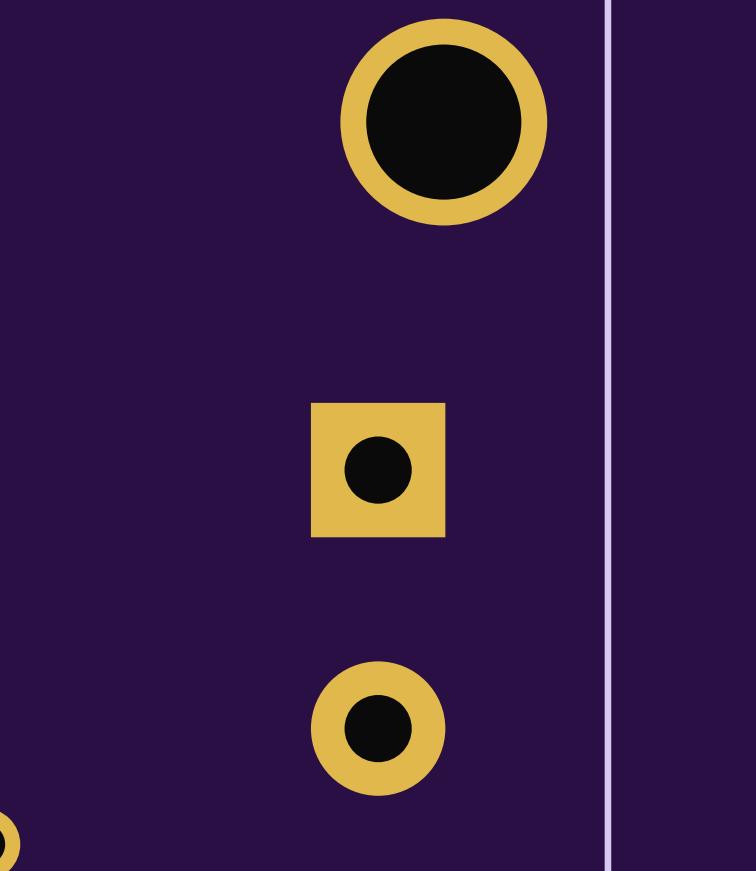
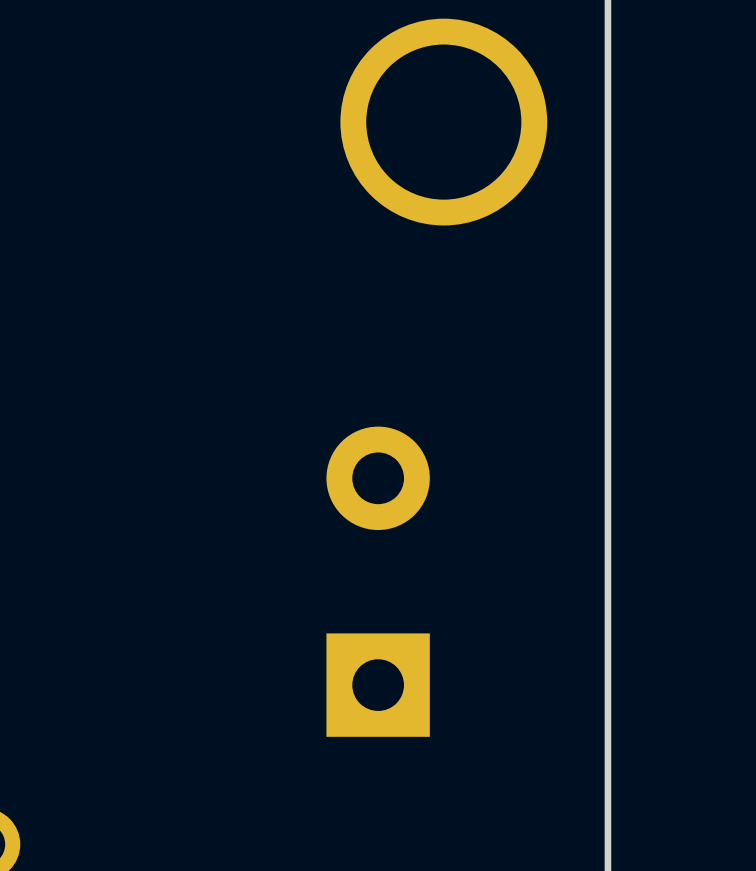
part footprint: [310, 402, 446, 796] -> [326, 426, 430, 737]

